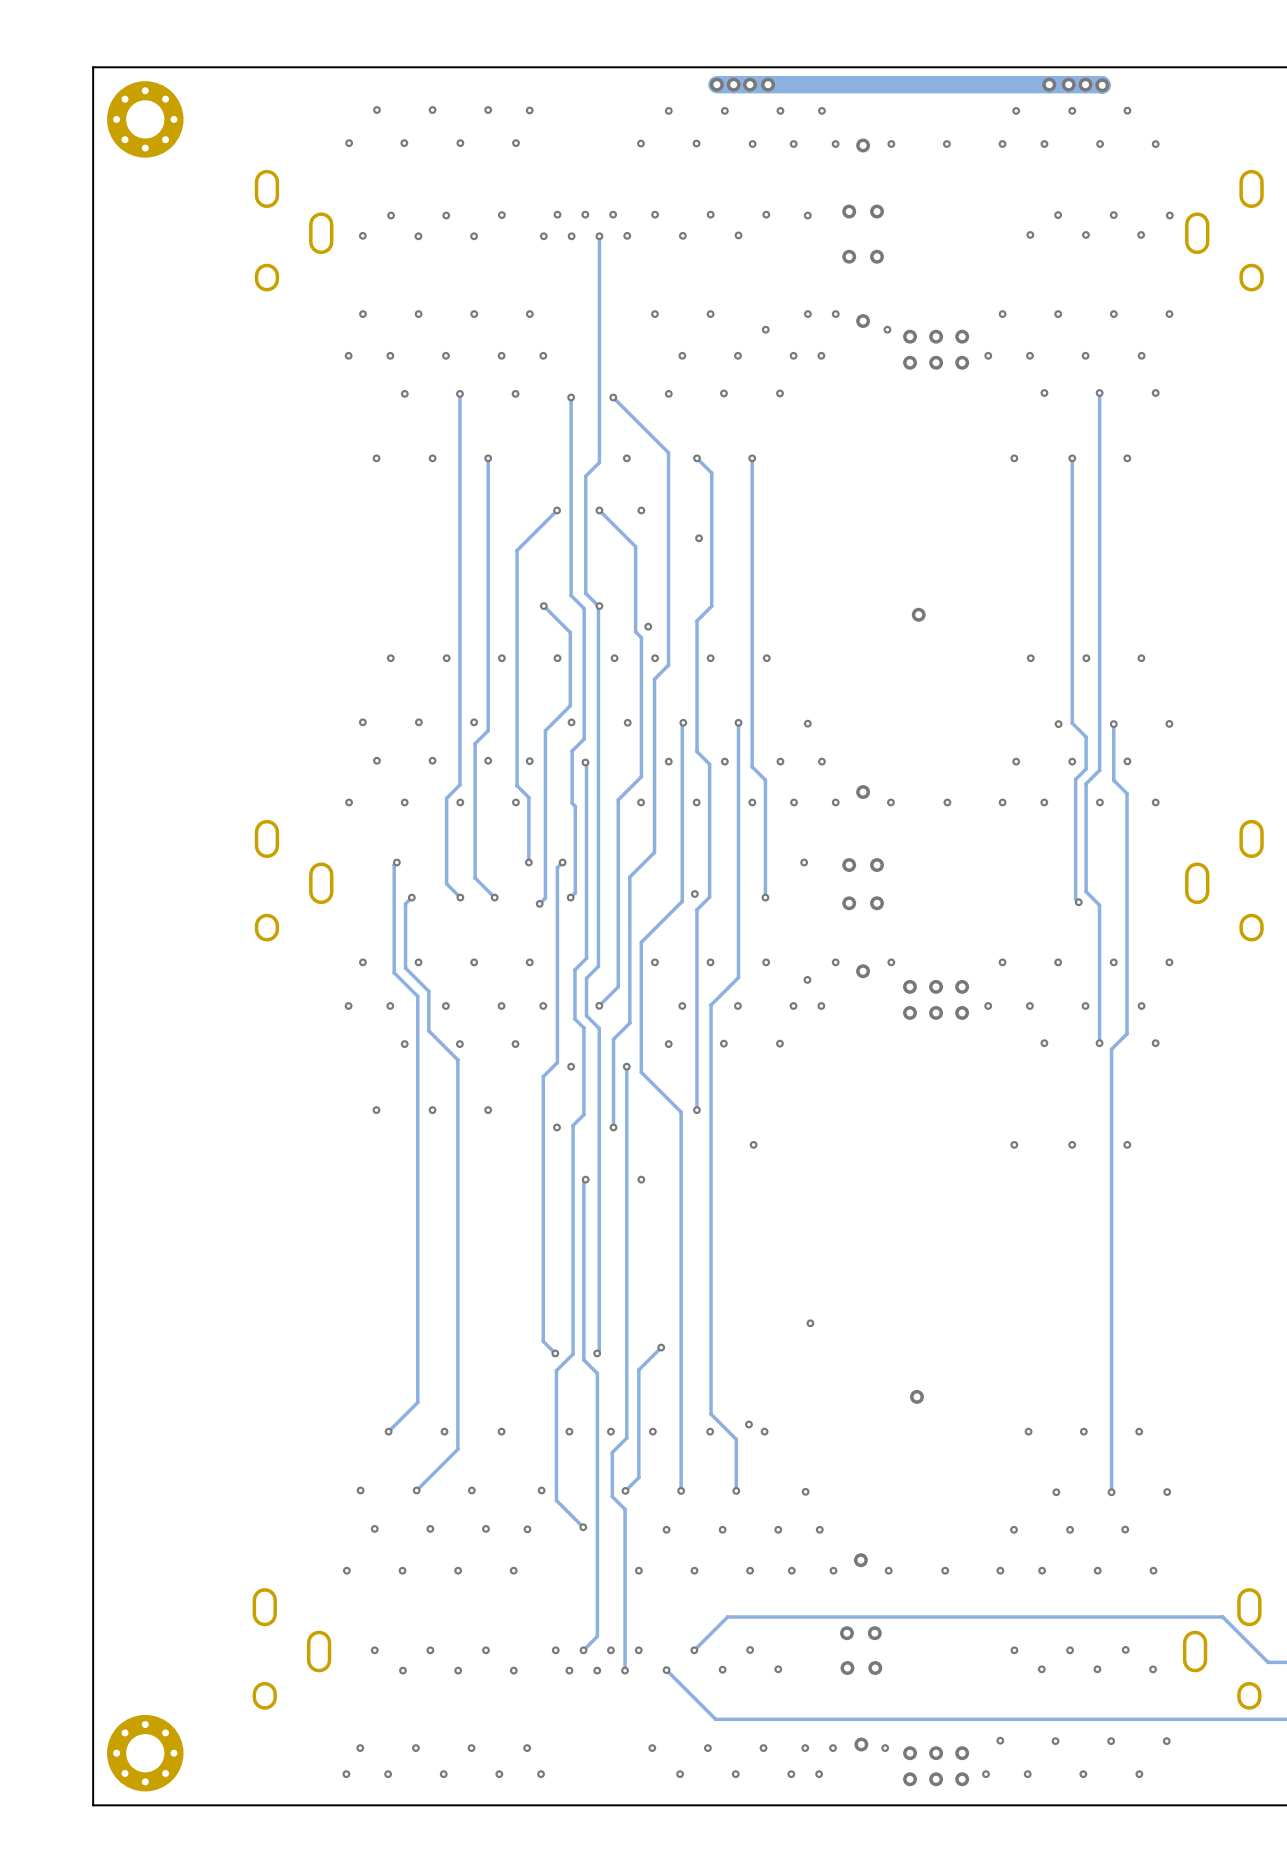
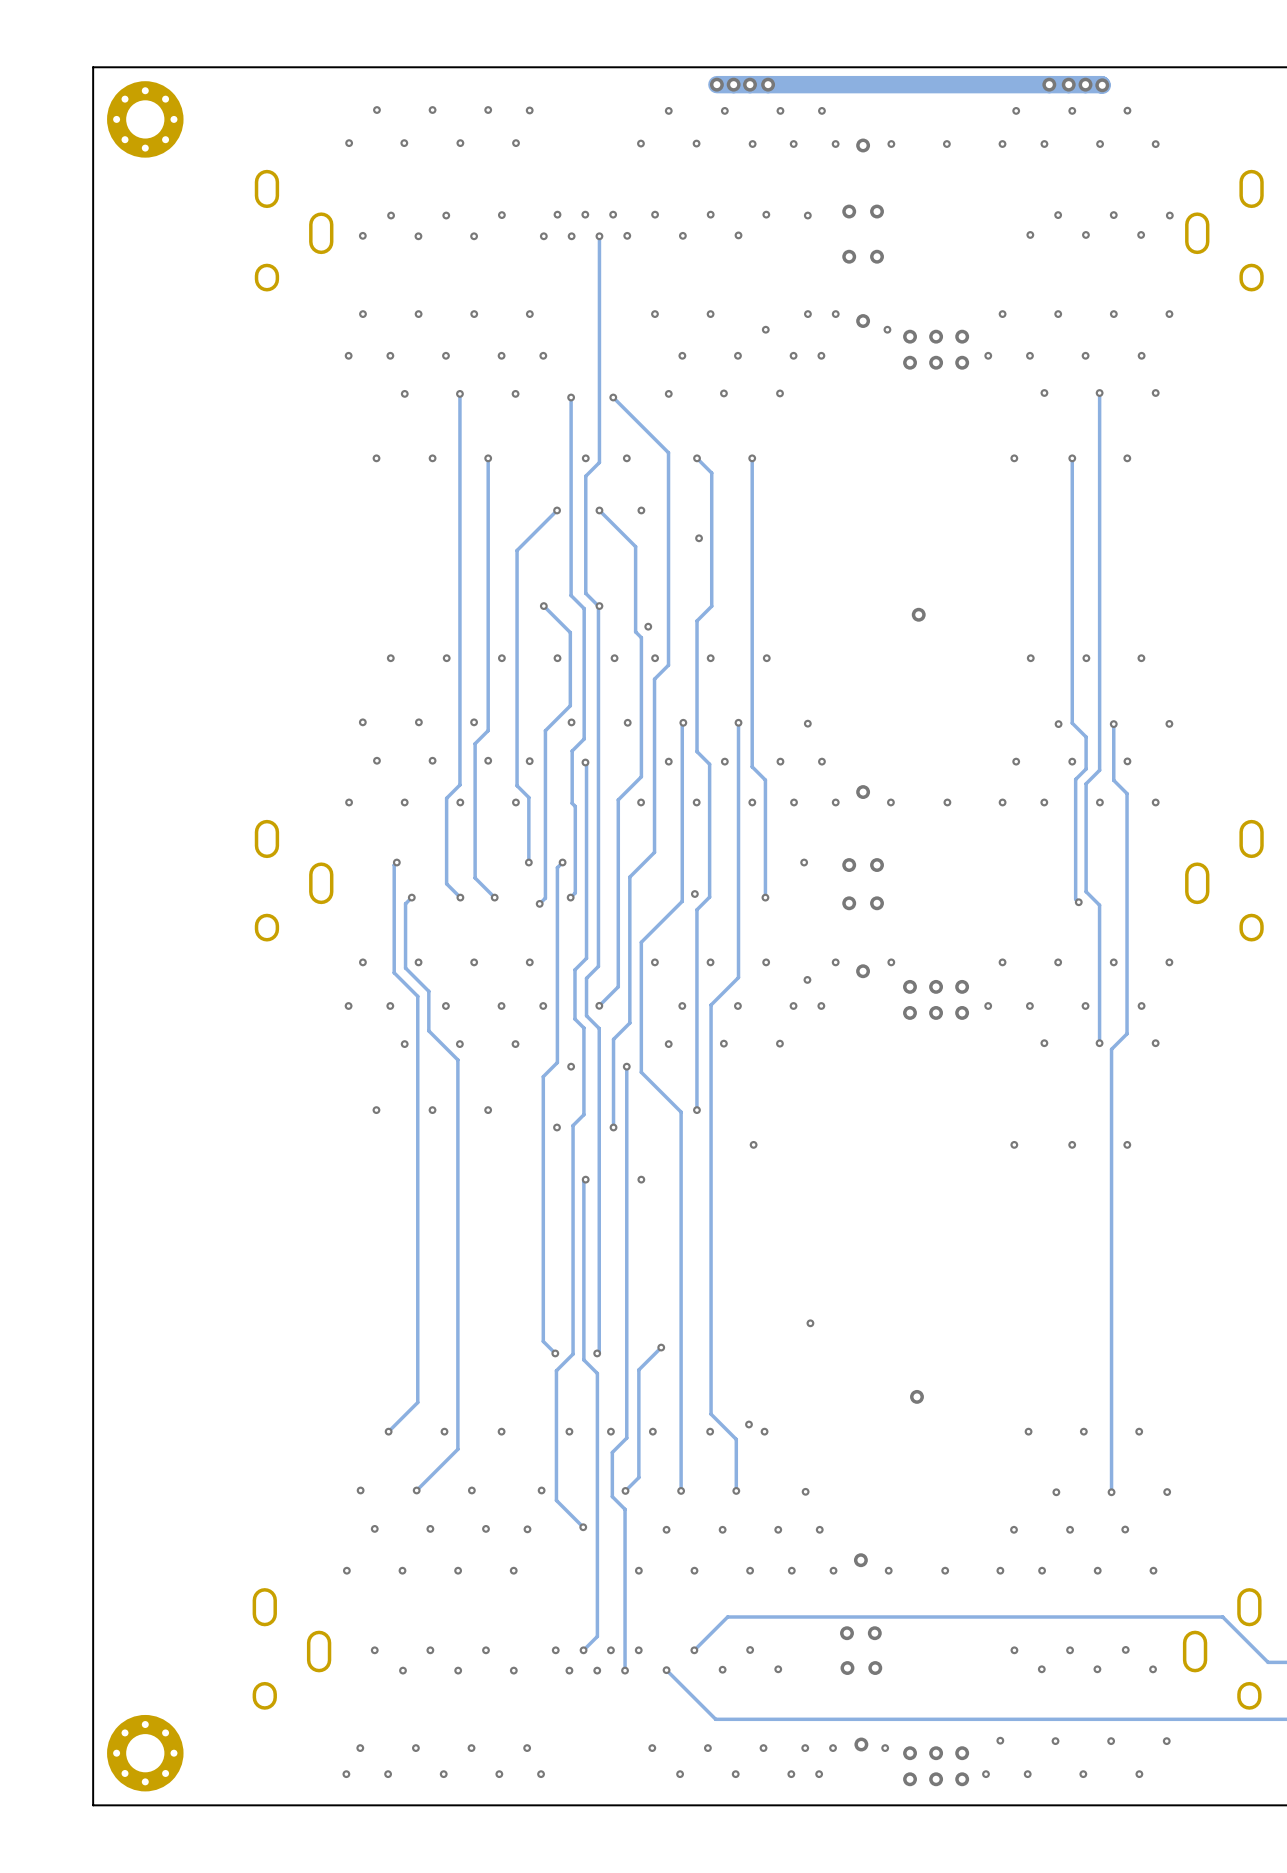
via: none -> (585, 458)

